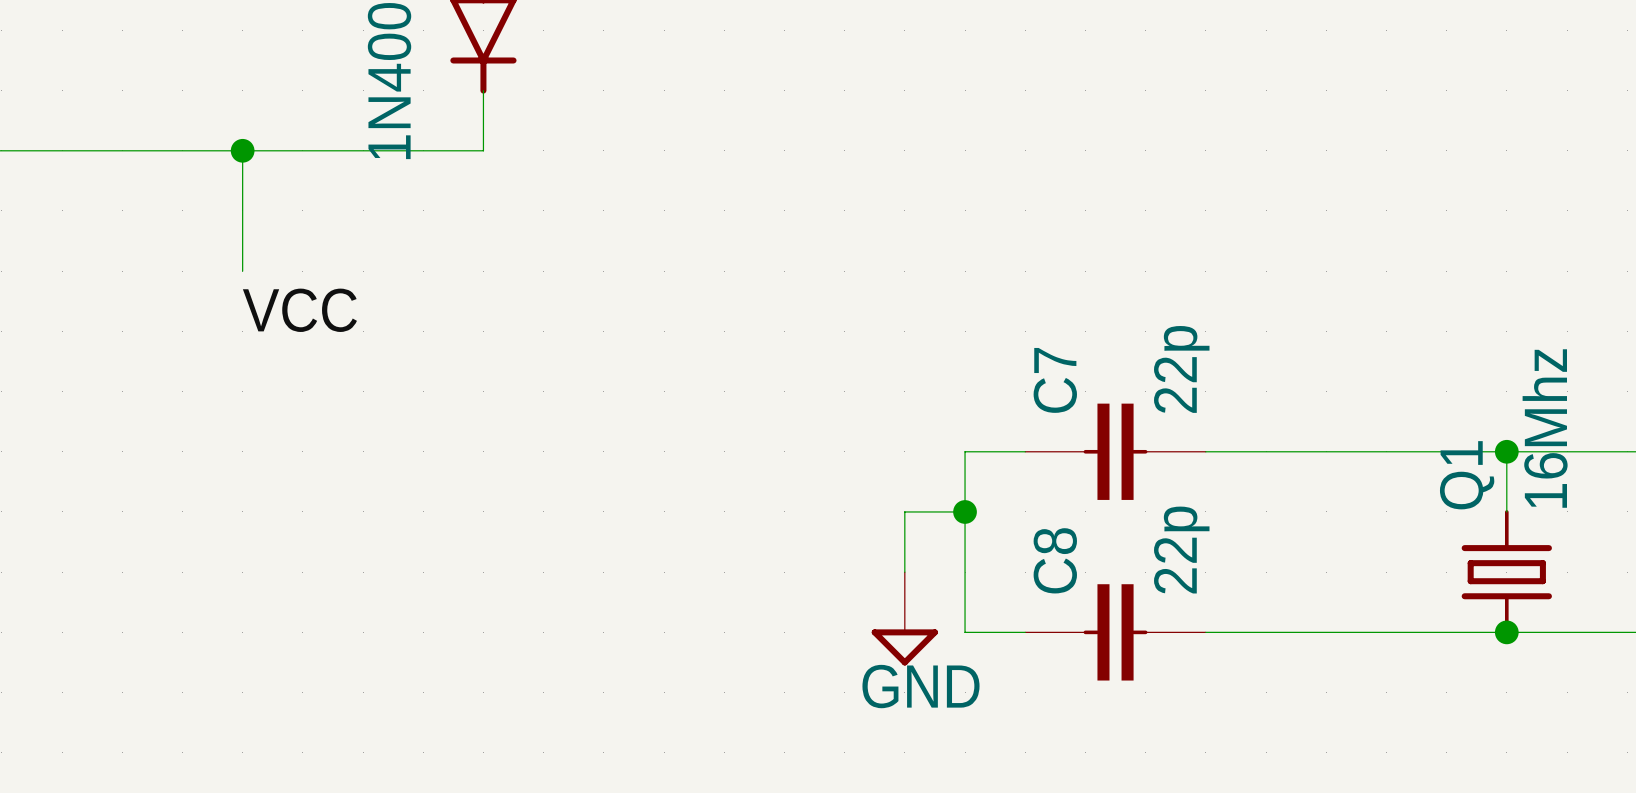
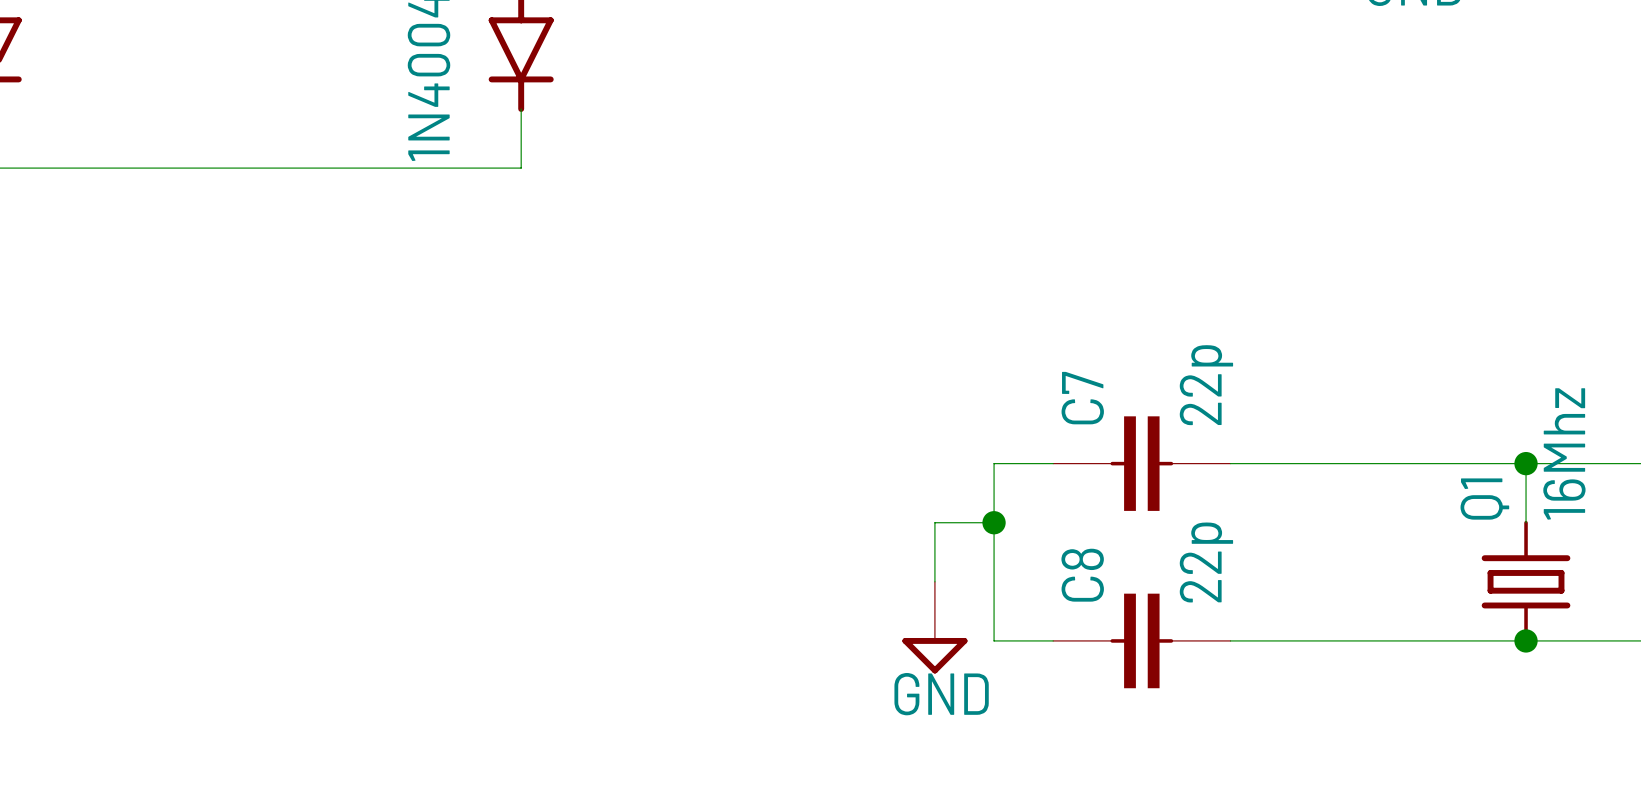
wire: (242, 150) (242, 271) -> none
junction: (242, 150) -> none
label: VCC (299, 310) -> none

